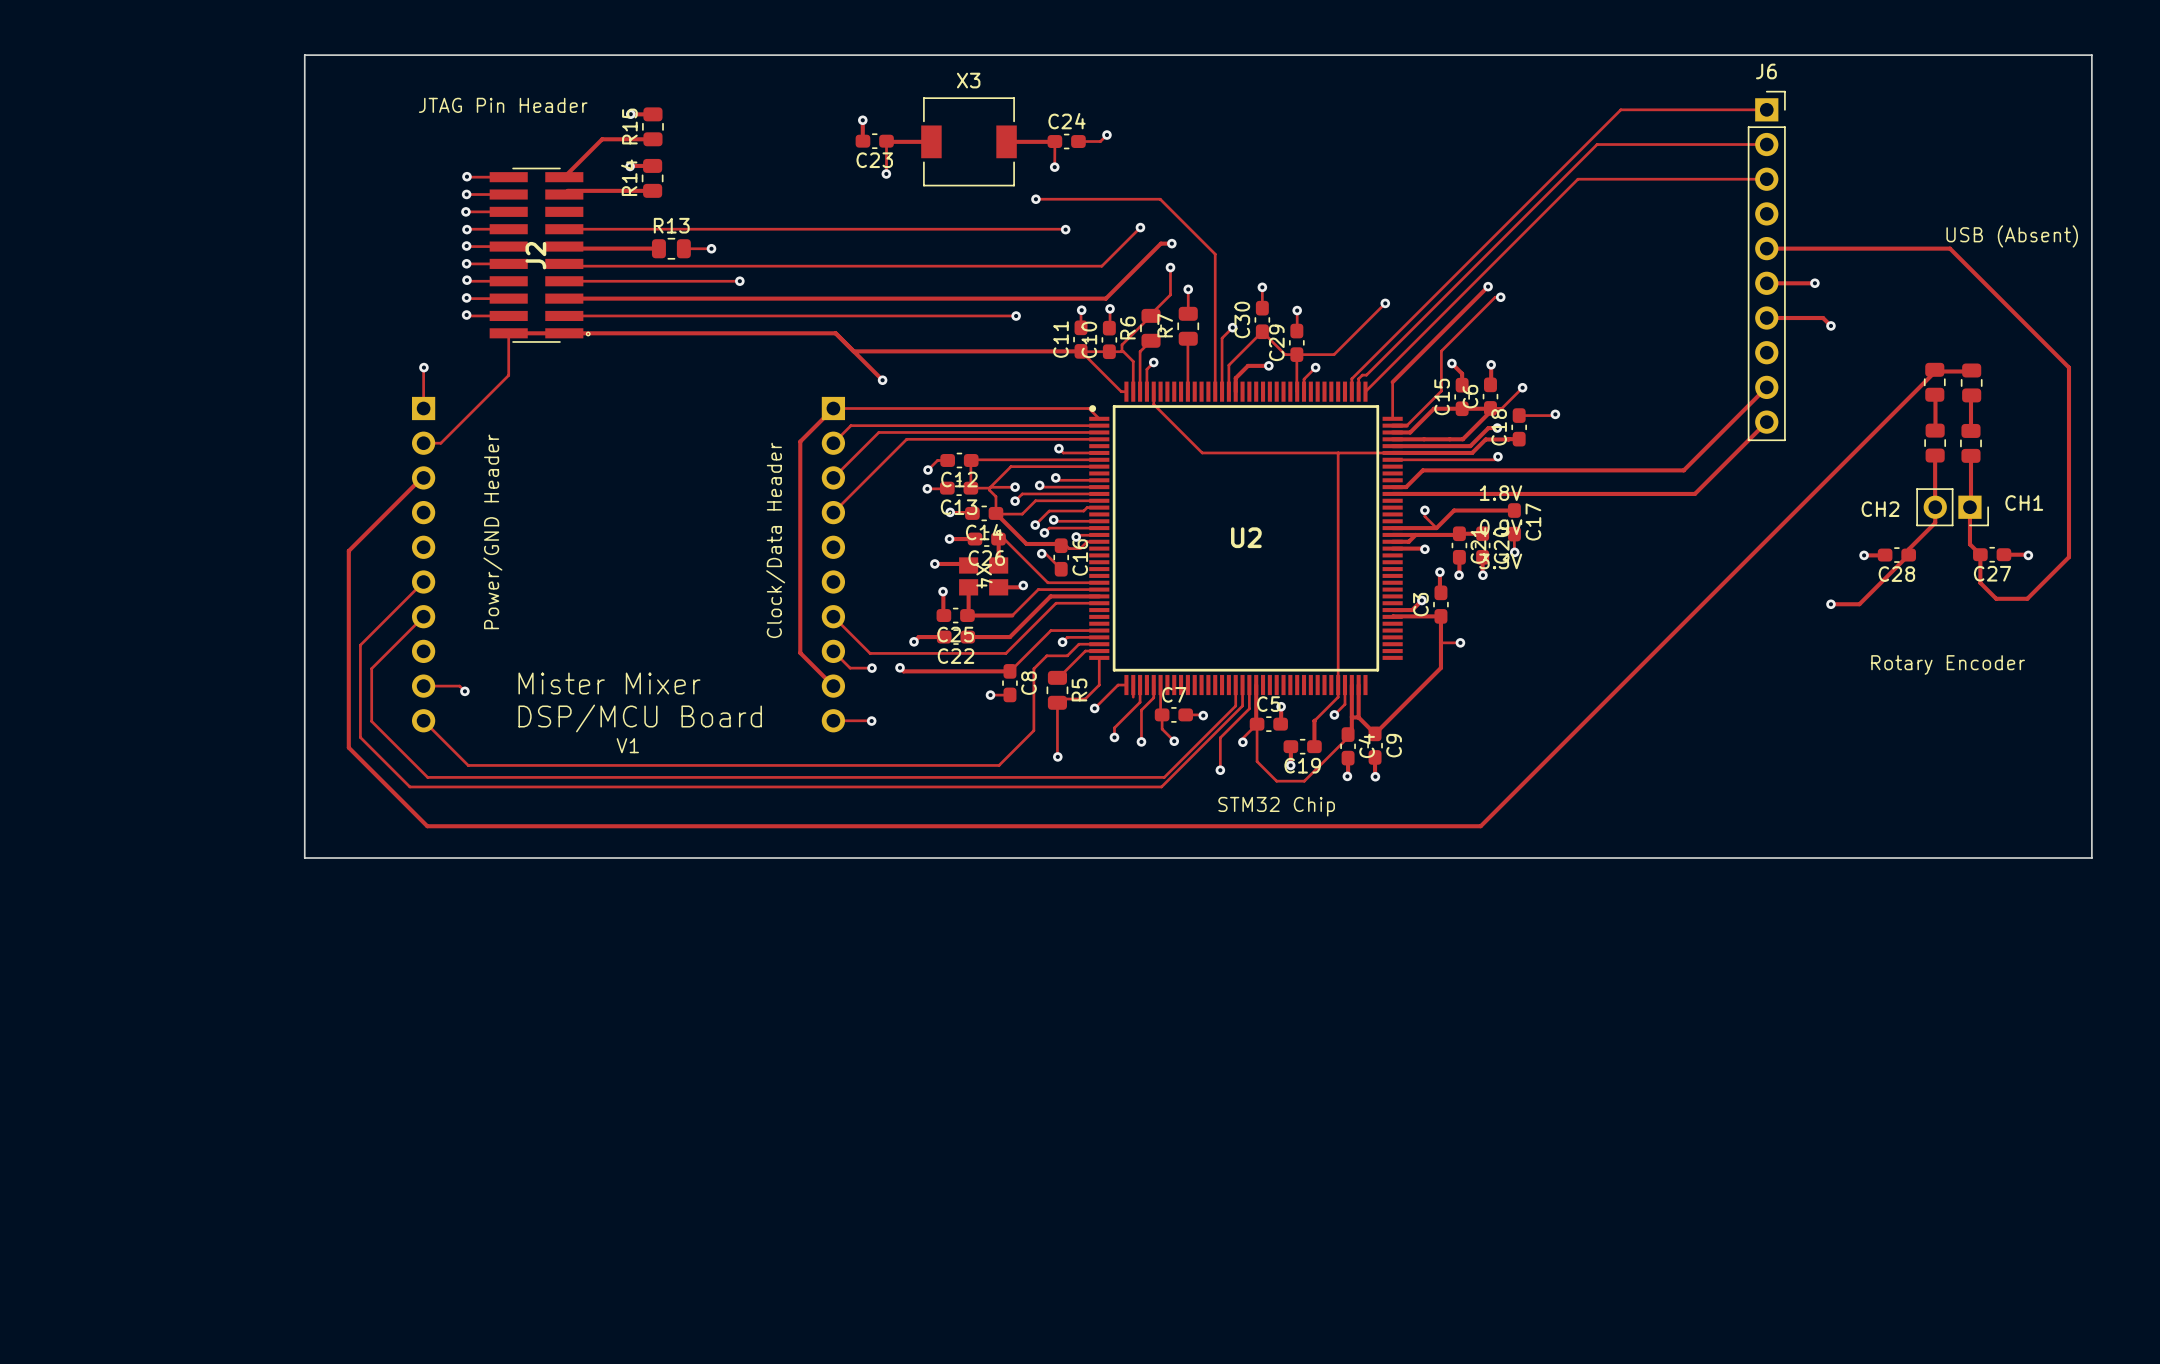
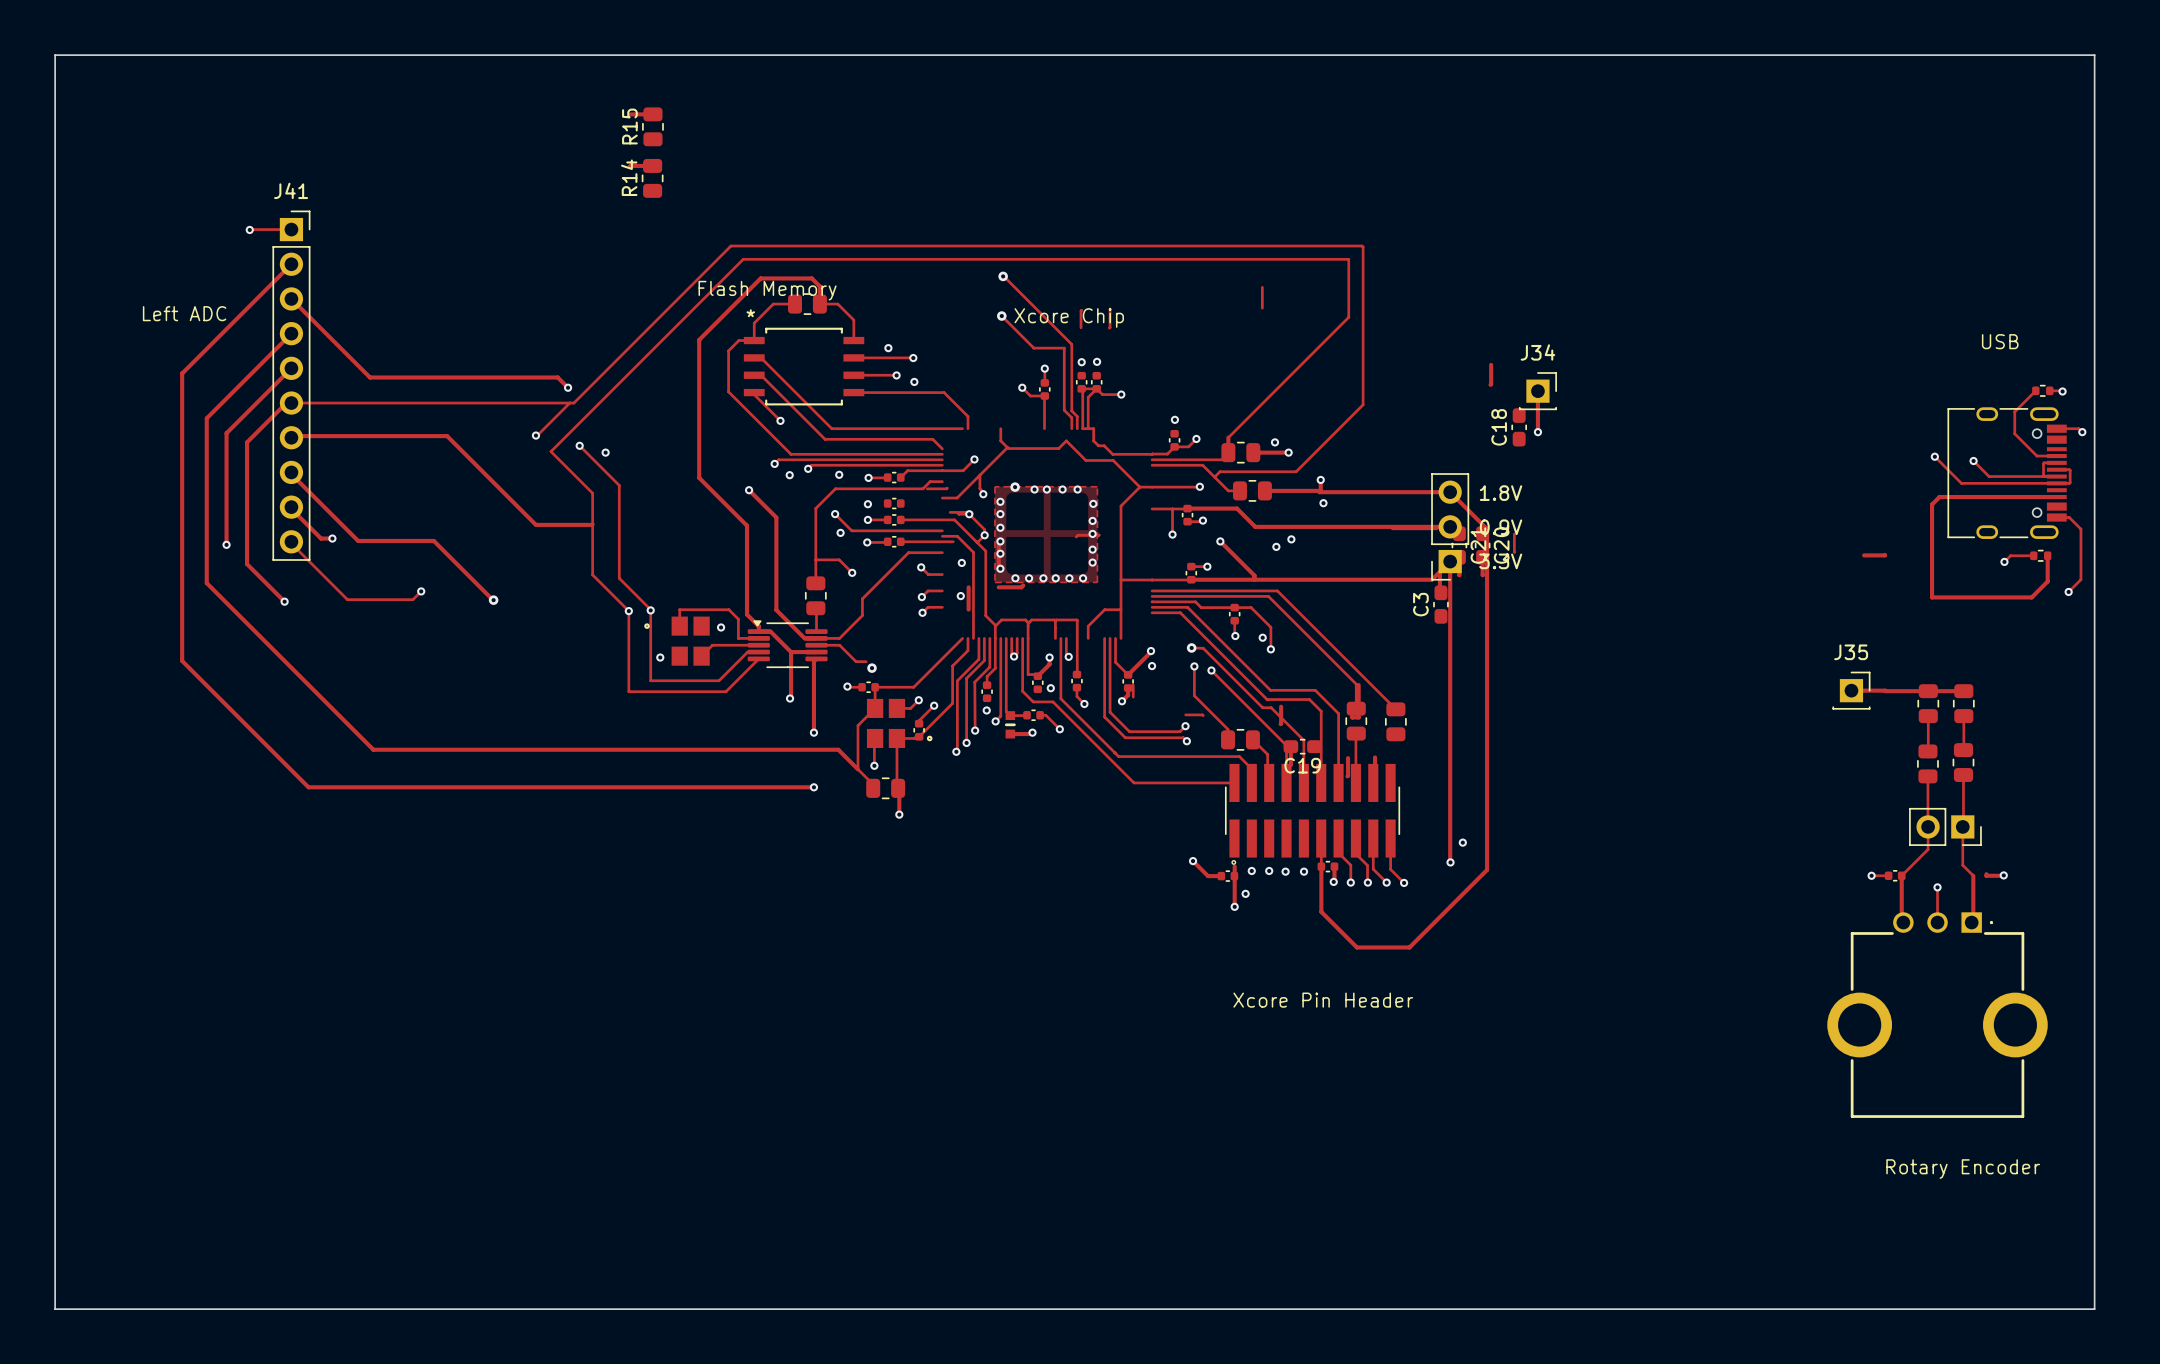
board edge: (304, 55) (304, 858) (2091, 858) (2091, 55) -> (304, 55) (55, 55) (55, 1309) (2094, 1309) (2094, 55) (2091, 55)
text: JTAG Pin Header (503, 105) -> none
track: (1766, 109) (1620, 109) (1351, 378) (1351, 391) -> none
via: (630, 114) -> none
track: (862, 120) (862, 141) -> none
via: (862, 120) -> none
track: (1106, 135) (1100, 141) (1078, 141) -> none
via: (1106, 135) -> none
track: (652, 139) (602, 139) (564, 177) -> none
track: (1053, 139) (1051, 141) (1006, 141) -> none
C23: (874, 141) -> none
track: (886, 141) (886, 173) -> none
track: (931, 141) (890, 141) (888, 144) -> none
X3: (968, 141) -> none
track: (1054, 141) (1054, 167) -> none
C24: (1066, 141) -> none
track: (1766, 144) (1597, 144) (1366, 375) (1362, 375) (1358, 378) (1358, 391) -> none
via: (630, 166) -> none
via: (1054, 167) -> none
via: (886, 173) -> none
track: (466, 176) (508, 177) -> none
via: (466, 176) -> none
track: (1766, 179) (1577, 179) (1365, 391) -> none
track: (652, 190) (567, 190) (564, 194) (566, 197) -> none
track: (466, 194) (508, 194) -> none
via: (466, 194) -> none
track: (1035, 199) (1160, 199) (1215, 254) (1215, 391) -> none
via: (1035, 199) -> none
track: (465, 211) (508, 211) -> none
via: (465, 211) -> none
track: (1140, 227) (1101, 266) (566, 266) (564, 263) -> none
via: (1140, 227) -> none
via: none -> (249, 229)
via: (466, 229) -> none
track: (508, 229) (466, 229) -> (291, 229) (249, 229)
track: (564, 229) (1065, 229) -> none
via: (1065, 229) -> none
text: USB (Absent) (2012, 236) -> none
track: (1171, 243) (1160, 243) (1105, 298) (564, 298) -> none
via: (1171, 243) -> none
track: (466, 246) (508, 246) -> none
via: (466, 246) -> none
track: (564, 246) (566, 248) (660, 248) -> none
R13: (671, 248) -> none
track: (683, 248) (711, 248) -> none
via: (711, 248) -> none
track: (1766, 248) (1950, 248) (2069, 367) (2069, 557) (2027, 598) (1996, 598) (1980, 582) (1980, 554) (1969, 544) (1970, 455) -> none
J2: (540, 255) -> none
track: (466, 263) (508, 263) -> none
via: (466, 263) -> none
track: none -> (291, 264) (182, 373) (182, 660) (308, 787) (813, 787)
J6: (1766, 265) -> none
track: (1170, 267) (1170, 294) (1121, 344) (1121, 351) -> none
via: (1170, 267) -> none
track: none -> (1003, 276) (1071, 344) (1071, 410) (1077, 416) (1077, 428)
via: none -> (1003, 276)
track: (466, 280) (508, 281) -> none
via: (466, 280) -> none
track: (564, 281) (739, 281) -> none
via: (739, 281) -> none
track: (1766, 283) (1814, 283) -> none
via: (1814, 283) -> none
track: (1488, 286) (1392, 382) (1392, 418) -> none
via: (1488, 286) -> none
via: (1262, 287) -> none
track: (1188, 289) (1188, 313) -> none
via: (1188, 289) -> none
text: none -> Flash Memory (767, 290)
track: (466, 297) (508, 298) -> none
via: (466, 297) -> none
track: (1500, 297) (1495, 297) (1441, 351) (1441, 391) (1406, 425) (1392, 425) -> none
via: (1500, 297) -> none
track: none -> (291, 298) (369, 377) (557, 377) (568, 387)
track: (1385, 303) (1334, 354) (1285, 354) (1262, 331) (1228, 365) (1228, 391) -> none
via: (1385, 303) -> none
track: none -> (794, 304) (773, 304) (754, 323) (754, 340)
part: none -> (807, 304)
via: (1110, 308) -> none
via: (1081, 310) -> none
track: (1297, 310) (1296, 331) -> none
via: (1297, 310) -> none
text: none -> Left ADC (184, 313)
track: (466, 315) (508, 315) -> none
via: (466, 315) -> none
track: none -> (1001, 316) (1033, 348) (1064, 348) (1064, 410) (1071, 417) (1071, 428)
via position: (1016, 316) -> (1001, 316)
text: none -> Xcore Chip (1069, 318)
track: (1766, 318) (1823, 318) (1830, 325) -> none
C30: (1262, 319) -> none
via: (1830, 325) -> none
R7: (1188, 326) -> none
track: (1232, 327) (1222, 338) (1222, 391) -> none
via: (1232, 327) -> none
R6: (1151, 328) -> none
track: none -> (291, 333) (206, 418) (206, 583) (373, 749) (838, 749) (858, 769)
track: (498, 333) (835, 333) (882, 380) -> none
track: (508, 333) (508, 375) (440, 443) (423, 443) -> none
track: (1189, 338) (1187, 391) -> none
C11: (1081, 339) -> none
C10: (1109, 339) -> none
track: none -> (761, 340) (738, 340) (728, 350) (728, 391) (791, 454) (942, 454)
track: none -> (853, 340) (853, 320) (837, 304) (819, 304) (819, 286) (811, 278) (760, 278) (699, 339) (699, 477) (747, 525) (747, 614) (758, 626) (758, 631) (770, 631) (791, 652)
track: (1151, 340) (1140, 351) (1140, 391) -> none
text: none -> USB (2000, 341)
C29: (1296, 342) -> none
via: none -> (888, 348)
track: (853, 351) (1081, 351) (1121, 391) (1126, 391) -> none
track: (1081, 351) (1123, 351) (1133, 361) (1133, 391) -> none
track: (1296, 354) (1297, 391) -> none
track: none -> (754, 357) (761, 357) (831, 428) (962, 428)
track: none -> (847, 357) (913, 357)
via: none -> (913, 358)
via: none -> (1097, 361)
via: none -> (1081, 362)
track: (1153, 362) (1146, 369) (1146, 391) -> none
via: (1153, 362) -> none
track: (1451, 363) (1462, 373) (1462, 385) -> none
via: (1451, 363) -> none
via: (1491, 364) -> none
track: (1268, 365) (1248, 365) (1235, 378) (1235, 391) -> none
via: (1268, 365) -> none
part: none -> (804, 366)
track: (423, 367) (423, 408) -> none
via: (423, 367) -> none
track: (1315, 367) (1304, 379) (1304, 391) -> none
via: (1315, 367) -> none
track: none -> (291, 368) (226, 433) (226, 544)
track: none -> (1044, 368) (1044, 382)
via: none -> (1044, 368)
track: (1970, 371) (1935, 371) (1480, 826) (427, 826) (348, 747) (348, 550) (423, 477) -> none
track: none -> (853, 375) (896, 375)
via: none -> (896, 375)
via: (882, 380) -> none
via: none -> (914, 381)
part: none -> (1081, 382)
part: none -> (1096, 382)
part: (1934, 382) -> none
part: (1971, 382) -> none
J41: none -> (291, 385)
via: none -> (568, 387)
track: none -> (1022, 387) (1030, 396) (1044, 396)
via: none -> (1022, 387)
track: (1522, 387) (1501, 408) (1490, 408) -> none
via: (1522, 387) -> none
track: (1766, 387) (1683, 470) (1422, 470) (1406, 487) (1392, 487) -> none
track: none -> (1096, 388) (1102, 394) (1121, 394)
track: none -> (1096, 388) (1088, 397) (1088, 428)
track: none -> (1096, 388) (1081, 388) (1082, 428) (1093, 428) (1093, 440) (1098, 445) (1104, 445) (1112, 454) (1167, 454) (1174, 446) (1188, 446) (1196, 438)
part: none -> (1044, 389)
track: none -> (2035, 390) (2014, 411) (2014, 433) (2036, 456) (2056, 456)
part: none -> (2042, 390)
track: none -> (2049, 390) (2062, 391)
track: (1153, 391) (1153, 404) (1202, 452) (1472, 452) (1485, 439) (1519, 439) -> none
track: none -> (1537, 391) (1537, 432)
J34: none -> (1537, 391)
via: none -> (2062, 391)
track: none -> (754, 392) (780, 420)
track: none -> (853, 392) (944, 392) (968, 416) (968, 428)
via: none -> (1121, 394)
track: none -> (1044, 396) (1044, 428)
C15: (1462, 396) -> none
C6: (1490, 396) -> none
track: (1935, 396) (1935, 431) -> (1928, 716) (1927, 751)
track: (1970, 396) (1970, 430) -> none
track: none -> (288, 401) (247, 442) (247, 564) (284, 601)
track: none -> (291, 403) (573, 403) (730, 246) (1362, 246) (1363, 404) (1296, 471) (1220, 471) (1214, 477)
track: none -> (569, 403) (535, 435)
track: (1490, 408) (1433, 408) (1410, 432) (1392, 432) -> none
track: (1490, 408) (1490, 411) (1462, 439) (1392, 439) -> none
track: (1555, 414) (1519, 415) -> none
via: (1555, 414) -> none
track: (1099, 418) (1088, 408) (833, 408) (800, 441) (800, 652) (833, 686) -> none
via: none -> (1174, 419)
via: none -> (780, 420)
track: (1766, 422) (1694, 493) (1392, 493) -> none
track: (1099, 425) (850, 425) (833, 443) -> none
track: none -> (1000, 428) (1000, 440) (1008, 448) (1058, 448) (1066, 440) (1085, 460) (1113, 460) (1139, 487)
track: (1497, 428) (1488, 428) (1470, 446) (1392, 446) -> none
via: (1497, 428) -> none
track: none -> (2056, 428) (2078, 428) (2082, 432)
track: (1099, 432) (878, 432) (833, 477) -> none
via: none -> (1537, 432)
via: none -> (2082, 432)
via: none -> (535, 435)
track: none -> (288, 436) (447, 436) (535, 524) (592, 524)
via: none -> (1196, 438)
track: (906, 439) (833, 512) -> (906, 439) (825, 439) (761, 375) (754, 375)
track: (932, 439) (1099, 439) -> (932, 439) (942, 448)
part: none -> (1174, 440)
via: none -> (1274, 442)
part: (1935, 443) -> none
part: (1970, 443) -> none
track: none -> (579, 445) (619, 485) (619, 578) (650, 609) (650, 680) (719, 680) (747, 652) (758, 652)
via: none -> (579, 445)
track: none -> (1007, 447) (957, 498) (942, 498)
via: (1058, 448) -> none
track: (1059, 448) (1063, 452) (1099, 452) -> none
via: none -> (605, 452)
part: none -> (1240, 452)
track: none -> (1288, 452) (1259, 452) (1253, 459)
via: none -> (1288, 452)
track: (1338, 452) (1338, 697) (1314, 720) (1314, 746) -> none
track: (1935, 455) (1935, 507) -> none
track: (1498, 456) (1494, 459) (1392, 459) -> none
via: (1498, 456) -> none
track: none -> (1934, 456) (1961, 483) (2069, 483) (2070, 470) (2056, 469)
via: none -> (1934, 456)
track: none -> (942, 459) (778, 459) (774, 463)
track: none -> (974, 459) (963, 470) (907, 470) (900, 477)
via: none -> (974, 459)
track: (1099, 459) (975, 459) (970, 464) -> none
track: none -> (1152, 459) (1226, 459)
track: none -> (1226, 459) (1228, 459) (1228, 437) (1348, 317) (1348, 259) (743, 259) (550, 451) (592, 493) (592, 574) (628, 611) (628, 691) (726, 691) (758, 658)
track: (947, 460) (937, 460) (928, 470) -> none
C12: (959, 460) -> none
track: (971, 460) (970, 488) (989, 488) -> none
track: none -> (1973, 461) (1989, 476) (2056, 476)
via: none -> (1973, 461)
track: none -> (2056, 462) (2043, 463) (2044, 476)
via: none -> (774, 463)
track: none -> (942, 465) (811, 465) (808, 468)
track: none -> (1152, 465) (1202, 465) (1228, 490) (1239, 490)
track: (1099, 466) (1011, 466) (989, 488) -> none
via: none -> (808, 468)
track: none -> (288, 470) (358, 540) (433, 540) (493, 600)
via: (928, 470) -> none
part: none -> (2007, 473)
via: none -> (839, 474)
via: none -> (789, 475)
track: none -> (979, 475) (979, 488) (984, 493)
via: none -> (868, 477)
track: none -> (887, 477) (868, 477)
part: none -> (894, 477)
track: (1055, 477) (1058, 480) (1099, 480) -> none
via: (1055, 477) -> none
track: none -> (1320, 479) (1319, 492) (1450, 492) (1487, 529) (1487, 869) (1409, 947) (1356, 947) (1321, 911) (1321, 838)
via: none -> (1320, 479)
track: none -> (942, 481) (930, 481) (922, 488) (835, 488) (815, 508) (815, 583)
track: (1039, 485) (1041, 487) (1099, 487) -> none
via: (1039, 485) -> none
zone outline: none -> (994, 486) (1097, 486) (1097, 582) (994, 582) (994, 486)
track: none -> (1199, 486) (1139, 487)
via: none -> (1199, 486)
track: (990, 487) (1014, 487) -> none
track: none -> (1139, 487) (1121, 506) (1121, 638)
via: (927, 488) -> none
C13: (959, 488) -> none
track: (989, 488) (995, 496) (995, 513) (1026, 543) (1063, 543) -> none
via: none -> (1034, 489)
via: none -> (1046, 489)
via: none -> (1062, 489)
via: none -> (1077, 489)
track: none -> (749, 490) (776, 517) (776, 610) (804, 638) (839, 638) (862, 615) (862, 598) (908, 552) (942, 552)
via: none -> (749, 490)
part: none -> (1252, 490)
track: none -> (1264, 490) (1320, 490)
track: (1099, 493) (1022, 493) (1015, 501) -> none
via: none -> (983, 494)
track: none -> (2056, 497) (1939, 497) (1932, 504) (1932, 597) (2031, 597) (2047, 581) (2047, 555)
track: (1099, 500) (1035, 500) (1022, 514) (996, 514) -> none
via: none -> (1000, 501)
via: (1015, 501) -> none
part: none -> (894, 503)
via: none -> (1093, 503)
via: none -> (1323, 503)
text: CH1 (2024, 503) -> none
via: none -> (867, 504)
track: none -> (288, 505) (321, 538) (332, 538)
track: (1099, 507) (1087, 507) (1083, 511) (1049, 511) (1035, 525) -> none
track: (1935, 507) (1935, 522) (1908, 549) (1908, 555) (1859, 604) (1830, 604) -> none
part position: (1952, 507) -> (1945, 826)
track: none -> (1152, 508) (1187, 508)
track: none -> (1172, 508) (1172, 534)
track: none -> (1187, 508) (1237, 508) (1255, 526) (1450, 526)
text: CH2 (1880, 509) -> none
track: (1424, 510) (1424, 516) (1436, 528) (1454, 510) (1514, 510) -> none
via: (1424, 510) -> none
via: (950, 512) -> none
track: none -> (958, 513) (969, 514) (984, 529) (984, 535) (977, 542)
C14: (984, 513) -> none
track: none -> (835, 514) (851, 530) (942, 530)
via: none -> (835, 514)
via: none -> (969, 514)
via: none -> (1000, 514)
part: none -> (1187, 515)
track: none -> (2056, 517) (2069, 517) (2080, 529) (2080, 579) (2068, 591)
track: none -> (867, 519) (887, 519)
via: none -> (867, 519)
part: none -> (894, 519)
track: none -> (900, 519) (954, 519) (985, 551) (985, 615) (995, 625)
track: (1053, 519) (1099, 521) -> none
via: (1053, 519) -> none
via: none -> (1092, 520)
track: none -> (1202, 520) (1187, 521)
via: none -> (1202, 520)
C17: (1514, 522) -> none
via: (1035, 525) -> none
part: none -> (1450, 526)
via: none -> (1000, 527)
track: (1099, 528) (1049, 528) (1044, 532) -> none
text: Power/GND Header (492, 531) -> none
via: none -> (840, 532)
via: (1044, 532) -> none
via: none -> (1092, 533)
track: (1482, 533) (1392, 534) -> none
via: none -> (1172, 534)
track: (1415, 534) (1408, 541) (1392, 541) -> none
via: none -> (984, 535)
track: none -> (942, 536) (957, 536) (973, 552) (973, 638)
via: (1076, 536) -> none
via: none -> (332, 538)
U2: (1245, 538) -> none
track: (949, 539) (974, 539) -> (791, 652) (816, 652)
via: (949, 539) -> none
C26: (986, 539) -> none
track: (998, 539) (1004, 539) (1047, 582) (1099, 582) -> none
via: none -> (1291, 539)
track: none -> (288, 540) (347, 599) (412, 599) (421, 591)
text: Clock/Data Header (775, 540) -> none
track: none -> (887, 541) (867, 542)
part: none -> (894, 541)
track: none -> (900, 541) (953, 541)
via: none -> (1000, 541)
track: (1099, 541) (1087, 541) (1080, 548) (1069, 548) (1063, 543) -> none
track: none -> (1220, 541) (1254, 575) (1254, 579)
via: none -> (1220, 541)
via: none -> (867, 542)
via: none -> (226, 544)
via: none -> (1276, 546)
track: (1392, 548) (1424, 549) -> none
via: none -> (1092, 549)
via: (1424, 549) -> none
via: (1514, 552) -> none
via: none -> (1000, 553)
track: (1041, 553) (1045, 553) (1061, 569) -> none
via: (1041, 553) -> none
C27: (1992, 554) -> none
track: (2003, 554) (2027, 555) -> none
via: (1864, 555) -> none
C28: (1896, 555) -> none
via: (2028, 555) -> none
track: none -> (2033, 555) (2010, 555) (2004, 561)
part: none -> (2040, 555)
C16: (1061, 557) -> none
track: none -> (815, 559) (839, 559) (852, 572)
via: none -> (2004, 561)
via: none -> (961, 562)
X4: (983, 562) -> none
via: none -> (1092, 562)
track: (934, 563) (968, 565) -> none
via: (934, 563) -> none
part: (423, 564) -> none
part: (833, 564) -> none
track: none -> (1191, 566) (1207, 566)
via: none -> (1207, 566)
track: none -> (921, 567) (928, 574) (942, 574)
via: none -> (921, 567)
via: none -> (1000, 568)
via: none -> (852, 572)
via: (1439, 572) -> none
part: none -> (1191, 573)
via: (1459, 575) -> none
via: (1482, 575) -> none
via: none -> (1015, 578)
via: none -> (1029, 578)
via: none -> (1043, 578)
via: none -> (1055, 578)
via: none -> (1069, 578)
via: none -> (1083, 578)
track: none -> (1191, 579) (1432, 579) (1450, 561) (1450, 862)
track: (423, 581) (360, 645) (360, 737) (409, 786) (1161, 786) (1242, 705) (1242, 685) -> none
via: (1023, 585) -> none
track: (1099, 589) (1038, 589) (1012, 615) (967, 615) -> none
track: none -> (942, 590) (928, 590) (921, 597)
track: none -> (1152, 590) (1277, 590) (1395, 709)
via: none -> (421, 591)
track: (943, 591) (943, 611) -> none
via: (943, 591) -> none
via: none -> (2068, 591)
part: none -> (815, 595)
via: none -> (960, 596)
track: (1099, 596) (1050, 596) (1009, 637) (967, 637) -> none
track: none -> (1152, 596) (1268, 596) (1356, 684) (1356, 708)
via: none -> (921, 597)
via: none -> (493, 600)
track: (1421, 600) (1412, 610) (1392, 610) -> none
via: (1421, 600) -> none
via: none -> (284, 601)
track: none -> (1152, 601) (1195, 601) (1201, 607) (1251, 607) (1270, 627) (1270, 649)
track: (1099, 603) (1056, 603) (1005, 653) (870, 653) (833, 616) -> none
via: (1830, 604) -> none
track: none -> (942, 607) (928, 607) (922, 612)
track: none -> (1152, 607) (1187, 607) (1270, 690) (1315, 690) (1338, 713) (1338, 782)
track: none -> (815, 608) (816, 631)
track: none -> (1121, 609) (1104, 609) (1088, 626) (1088, 638)
via: none -> (650, 610)
via: none -> (628, 611)
via: none -> (922, 612)
track: none -> (1152, 612) (1180, 612) (1267, 699) (1309, 699) (1321, 711) (1321, 782)
part: none -> (1234, 614)
C25: (955, 615) -> none
track: (423, 616) (371, 668) (371, 721) (427, 777) (1164, 777) (1235, 706) (1235, 685) -> none
track: (1392, 616) (1440, 616) (1440, 667) (1375, 733) (1358, 717) -> none
track: none -> (1055, 620) (1077, 620) (1076, 674)
track: none -> (1055, 620) (1055, 638)
track: none -> (1055, 620) (1031, 619) (1028, 622)
track: none -> (1234, 620) (1235, 636)
track: none -> (1028, 622) (1028, 674) (1037, 674)
track: none -> (1028, 622) (1025, 619) (1001, 619) (995, 626) (995, 668) (987, 676) (987, 683)
track: none -> (679, 626) (679, 609) (728, 609) (738, 619) (738, 638) (758, 638)
via: none -> (721, 627)
track: (1099, 630) (1050, 630) (1010, 671) -> none
via: none -> (1235, 636)
track: (944, 637) (918, 637) (914, 641) -> none
C22: (956, 637) -> none
track: (1099, 637) (1067, 637) (1062, 642) -> none
via: none -> (1262, 637)
track: none -> (962, 638) (913, 687) (875, 687) (875, 708) (858, 725) (858, 769)
track: none -> (968, 638) (968, 650) (952, 666) (952, 703) (919, 736) (896, 738)
track: none -> (978, 638) (978, 659) (957, 680) (956, 751)
track: none -> (984, 638) (984, 660) (966, 678) (966, 742)
track: none -> (989, 638) (989, 667) (974, 682) (974, 730)
track: none -> (1000, 638) (1000, 716) (995, 721)
track: none -> (1006, 638) (1006, 711) (1010, 715) (1026, 715)
track: none -> (1011, 638) (1011, 654) (1014, 656) (1017, 653) (1017, 638)
track: none -> (1022, 638) (1022, 691) (1033, 701) (1053, 701) (1134, 782) (1234, 782)
track: none -> (1060, 638) (1060, 698) (1118, 756) (1239, 756) (1251, 768) (1251, 782)
track: none -> (1066, 638) (1066, 654) (1068, 656)
track: none -> (1104, 638) (1104, 716) (1125, 737) (1183, 737) (1186, 741)
track: none -> (1110, 638) (1110, 712) (1129, 731) (1180, 731) (1185, 726)
track: none -> (1115, 638) (1115, 662) (1128, 674) (1151, 651)
part: none -> (676, 641)
via: (914, 641) -> none
via: (1062, 642) -> none
track: (1440, 642) (1460, 642) -> none
via: (1460, 642) -> none
part: none -> (787, 644)
track: (1099, 644) (1078, 644) (1067, 655) (1046, 655) (1033, 668) (1033, 730) (999, 765) (468, 765) (423, 720) -> none
track: none -> (758, 645) (712, 645) (701, 656)
track: none -> (816, 645) (839, 645) (856, 661) (866, 661)
via: none -> (1191, 647)
track: none -> (1190, 648) (1203, 648) (1262, 707) (1271, 707) (1303, 740) (1303, 782)
via: none -> (1270, 649)
track: (833, 651) (850, 668) (872, 668) -> none
track: (1099, 651) (1085, 651) (1062, 674) (1057, 674) -> none
via: none -> (1151, 651)
track: none -> (791, 652) (790, 698)
via: none -> (1014, 656)
via: none -> (1068, 656)
via: none -> (660, 657)
track: none -> (1049, 657) (1049, 664) (1037, 676)
via: none -> (1049, 657)
track: (1099, 657) (1099, 685) (1085, 699) (1057, 699) -> none
track: none -> (816, 658) (813, 661) (813, 732)
text: Rotary Encoder (1948, 664) -> none
via: none -> (1152, 666)
track: none -> (1194, 666) (1194, 695) (1228, 729) (1228, 739)
via: none -> (1194, 666)
track: (900, 667) (903, 671) (1009, 671) -> none
via: (900, 667) -> none
track: none -> (1211, 670) (1286, 745) (1286, 782)
via: none -> (1211, 670)
part: none -> (1076, 681)
part: none -> (1128, 681)
part: none -> (1037, 682)
text: Mister Mixer (609, 683) -> none
C8: (1009, 683) -> none
track: (1126, 685) (1118, 685) (1094, 708) -> none
track: (1140, 685) (1140, 702) (1114, 727) (1114, 737) -> none
track: (1153, 685) (1153, 697) (1141, 710) (1141, 741) -> none
track: (1160, 685) (1162, 729) (1174, 741) -> none
track: (1249, 685) (1249, 708) (1220, 737) (1220, 770) -> none
track: (1256, 685) (1257, 724) -> none
track: (1345, 685) (1345, 704) (1334, 714) -> none
track: (1351, 685) (1351, 730) (1348, 737) (1304, 781) (1276, 781) (1257, 761) (1257, 724) -> none
track: (423, 686) (459, 686) (464, 691) -> none
track: none -> (847, 686) (862, 687)
via: none -> (847, 686)
part: none -> (868, 687)
track: none -> (1076, 687) (1076, 696) (1084, 703)
via: none -> (1050, 688)
track: none -> (1128, 688) (1128, 695) (1121, 701)
R5: (1057, 690) -> none
track: none -> (1851, 690) (1963, 691)
J35: none -> (1851, 690)
via: (464, 691) -> none
part: none -> (987, 691)
track: (990, 695) (1009, 695) -> none
via: (990, 695) -> none
via: none -> (790, 698)
track: none -> (918, 700) (910, 708) (896, 708)
via: none -> (918, 700)
via: none -> (1121, 701)
track: (1057, 702) (1057, 756) -> none
via: none -> (1084, 703)
part: none -> (1928, 703)
part: none -> (1963, 703)
track: none -> (934, 705) (919, 720) (919, 723)
via: none -> (934, 705)
via: (1281, 706) -> none
via: (1094, 708) -> none
via: none -> (986, 710)
C7: (1173, 714) -> none
via: (1334, 714) -> none
part: none -> (1033, 715)
track: none -> (1040, 715) (1045, 715) (1059, 729)
via: (1203, 715) -> none
track: none -> (1963, 716) (1963, 750)
text: DSP/MCU Board (640, 718) -> none
track: (833, 720) (871, 721) -> none
via: (871, 721) -> none
via: none -> (995, 721)
part: none -> (1356, 721)
part: none -> (1395, 721)
part: none -> (899, 723)
part: none -> (1010, 724)
track: (1257, 724) (1242, 738) (1242, 742) -> none
C5: (1268, 724) -> none
via: none -> (1185, 726)
via: none -> (1059, 729)
part: none -> (919, 730)
via: none -> (975, 730)
via: none -> (813, 732)
track: none -> (1032, 732) (1010, 734)
via: none -> (1032, 732)
track: none -> (1356, 733) (1355, 782)
via: (1114, 737) -> none
track: none -> (875, 738) (874, 765)
track: none -> (896, 738) (898, 784)
part: none -> (1240, 739)
track: none -> (1252, 739) (1267, 754) (1269, 782)
via: (1141, 741) -> none
via: (1174, 741) -> none
via: none -> (1186, 741)
via: none -> (966, 742)
via: (1242, 742) -> none
text: V1 (627, 745) -> none
C9: (1375, 745) -> none
C4: (1348, 746) -> none
via: none -> (956, 751)
via: (1057, 756) -> none
part: none -> (1963, 762)
part: none -> (1927, 763)
via: none -> (874, 765)
via: (1290, 765) -> none
track: none -> (858, 769) (873, 784) (873, 788)
via: (1220, 770) -> none
track: none -> (1963, 775) (1962, 865) (1973, 875) (1973, 920) (1971, 922)
via: (1347, 776) -> none
via: (1375, 776) -> none
track: none -> (1927, 776) (1927, 826)
via: none -> (813, 787)
part: none -> (885, 788)
track: none -> (898, 788) (899, 814)
text: STM32 Chip (1276, 806) -> none
via: none -> (899, 814)
part: none -> (1312, 814)
track: none -> (1928, 826) (1928, 849) (1901, 875)
track: none -> (1338, 838) (1338, 852) (1350, 865) (1350, 882)
track: none -> (1355, 838) (1355, 853) (1367, 865) (1367, 882)
track: none -> (1373, 838) (1373, 869) (1386, 882)
track: none -> (1390, 838) (1390, 869) (1404, 882)
via: none -> (1462, 842)
track: none -> (1193, 861) (1208, 876) (1221, 876)
via: none -> (1193, 861)
via: none -> (1450, 862)
track: none -> (1234, 866) (1234, 906)
part: none -> (1327, 866)
track: none -> (1334, 866) (1333, 881)
via: none -> (1251, 870)
via: none -> (1269, 870)
via: none -> (1285, 871)
via: none -> (1304, 871)
track: none -> (1986, 874) (1986, 875) (2003, 875)
track: none -> (1871, 875) (1888, 875)
via: none -> (1871, 875)
part: none -> (1895, 875)
track: none -> (1901, 875) (1901, 920) (1903, 922)
via: none -> (2003, 875)
part: none -> (1227, 876)
via: none -> (1333, 881)
via: none -> (1350, 882)
via: none -> (1367, 882)
via: none -> (1386, 882)
via: none -> (1404, 882)
track: none -> (1937, 887) (1937, 922)
via: none -> (1937, 887)
via: none -> (1245, 893)
via: none -> (1234, 906)
text: none -> Xcore Pin Header (1323, 1000)
part: none -> (1937, 1015)
text: none -> Rotary Encoder (1963, 1169)

